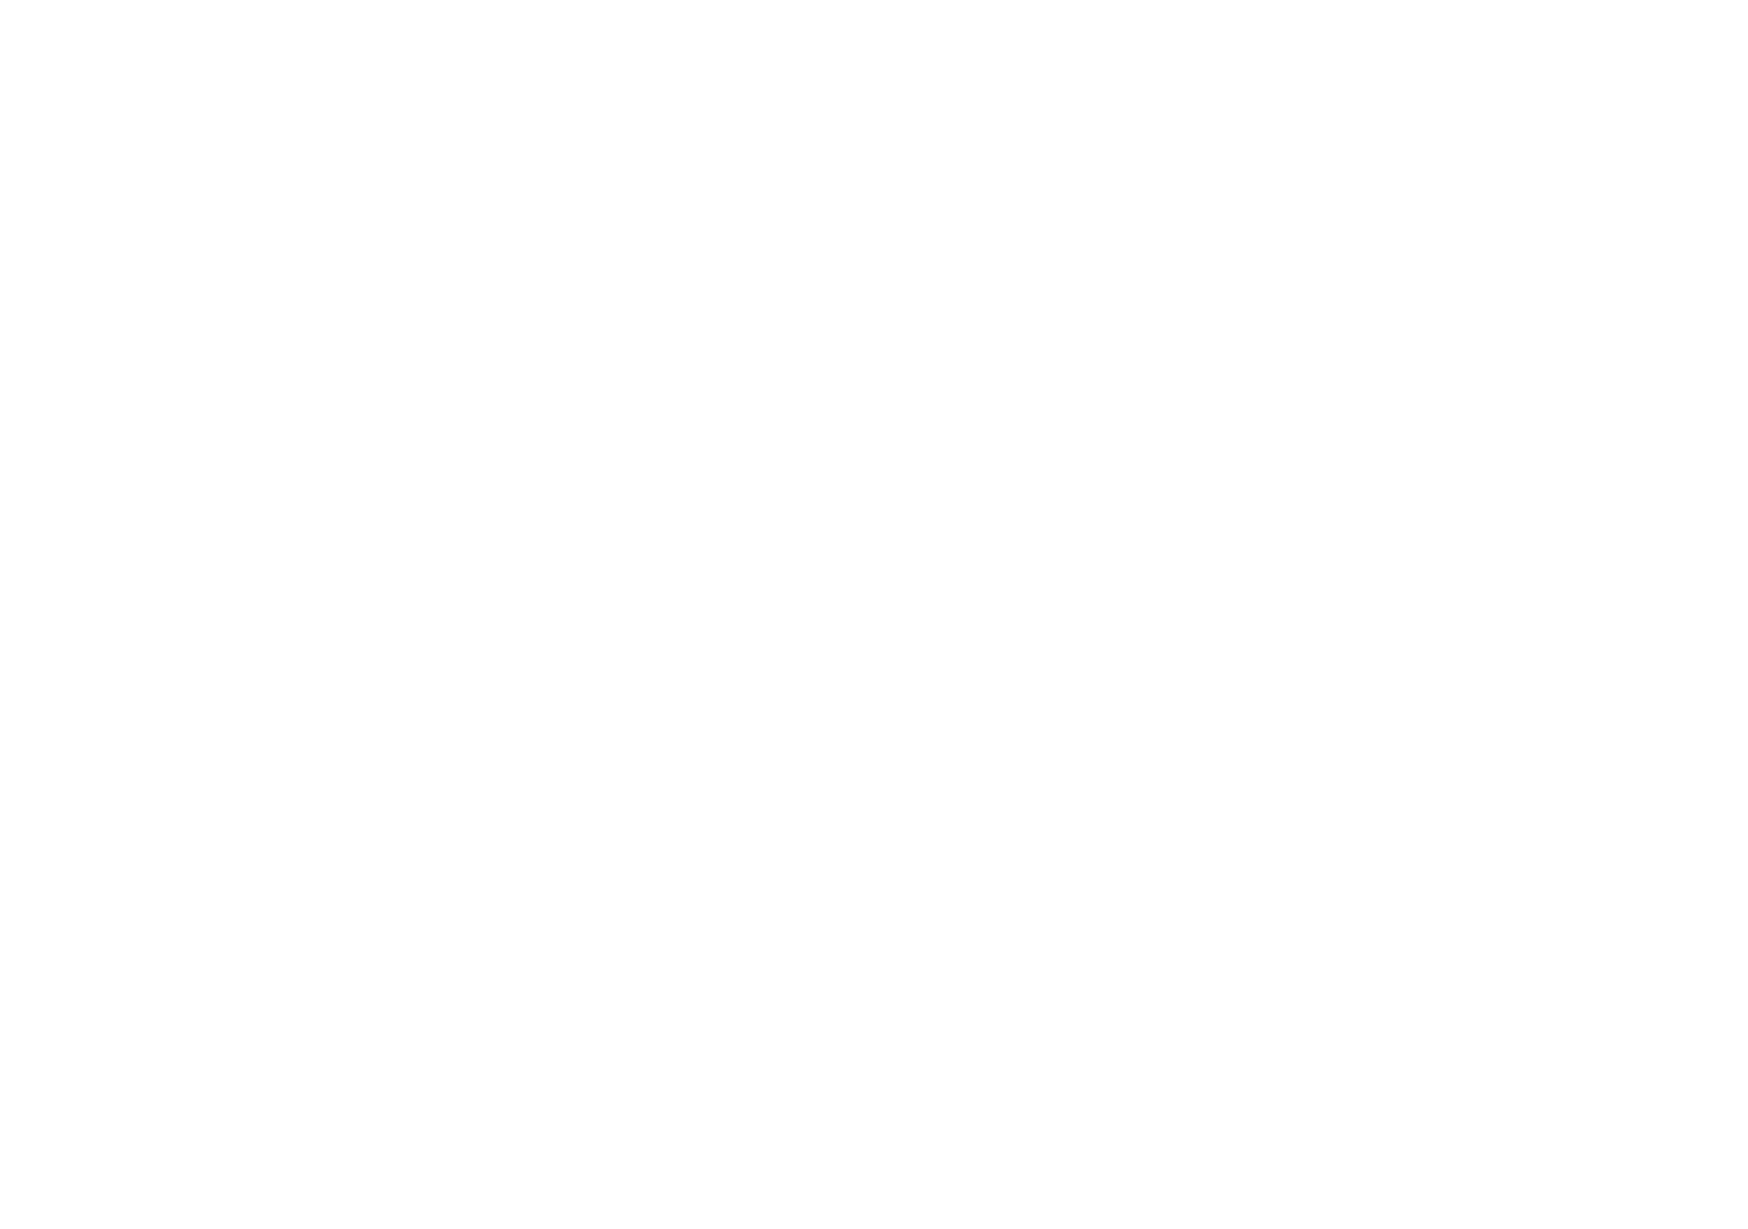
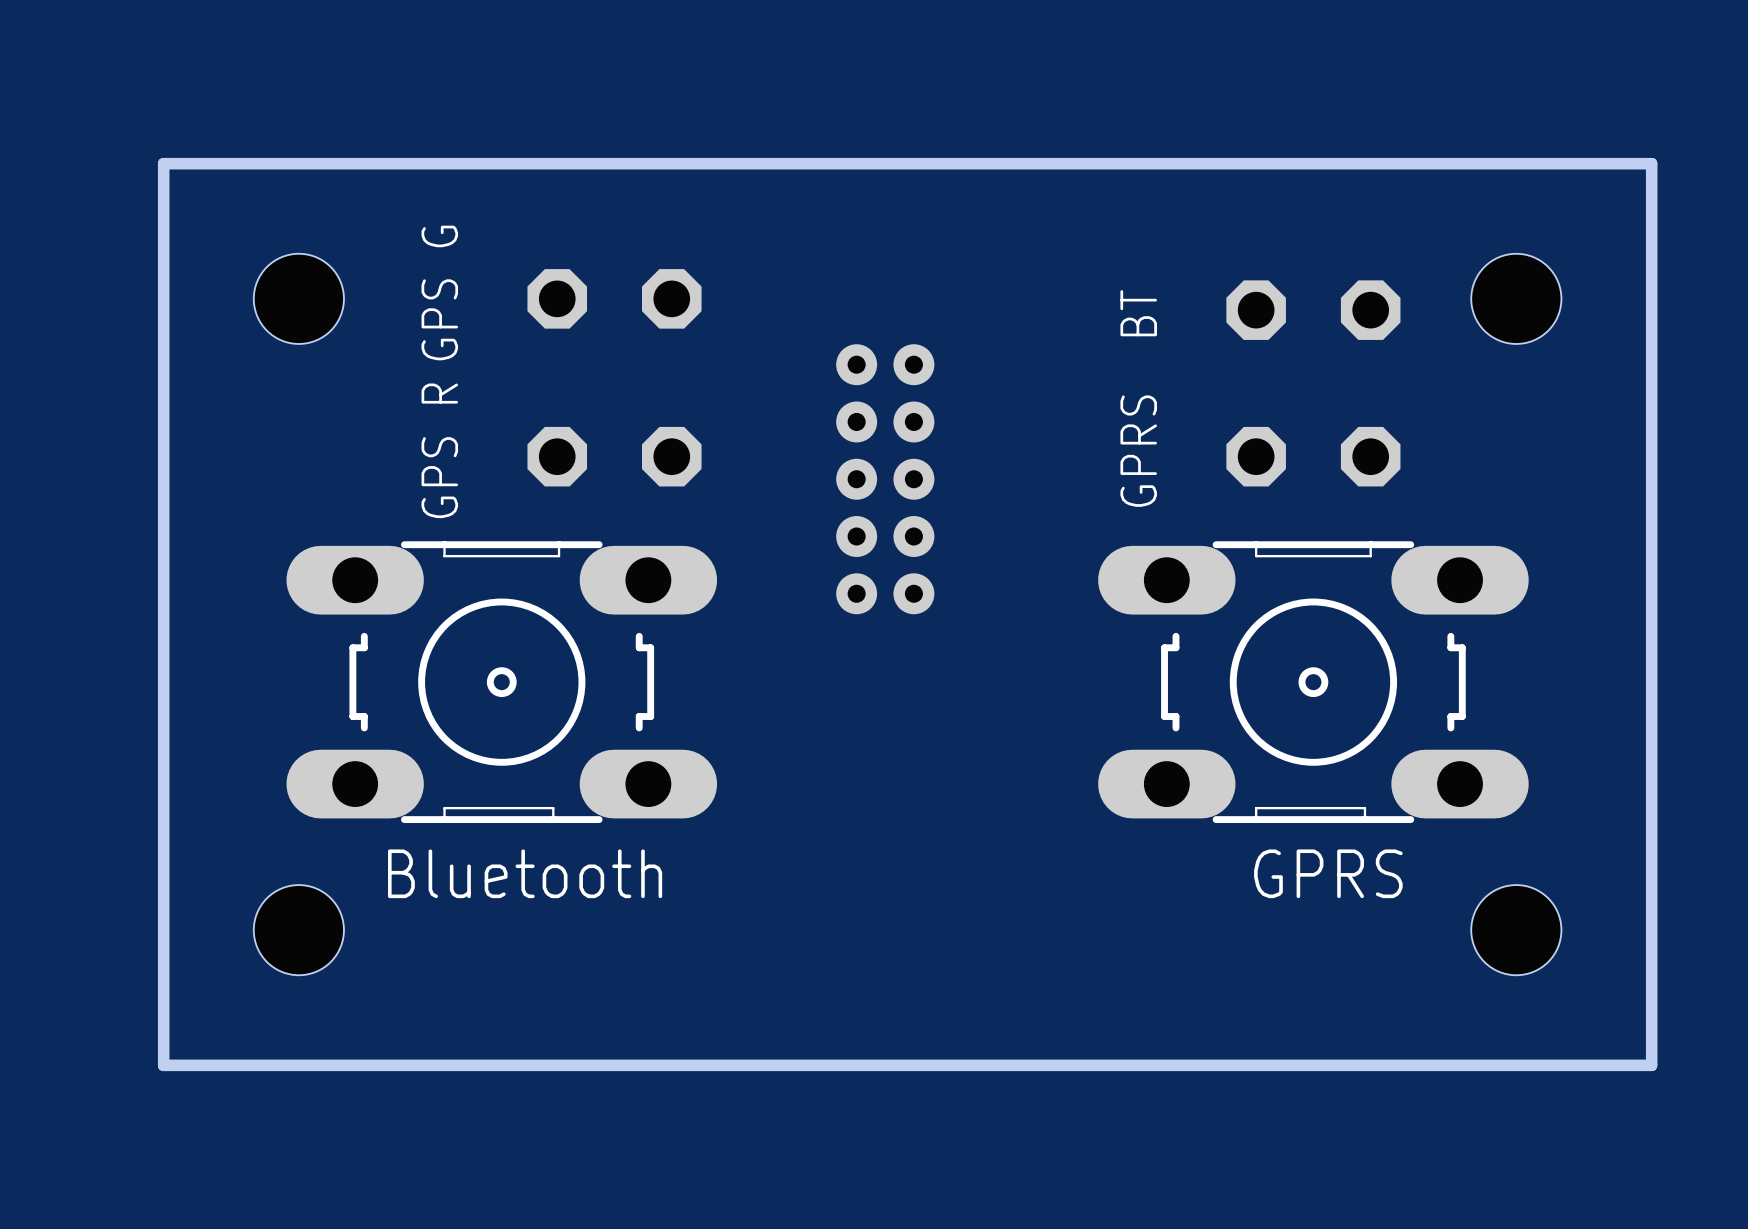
board edge: none -> (163, 163) (1651, 163) (1651, 1065) (163, 1065) (163, 163)
hole: none -> (298, 298)
part: none -> (614, 298)
hole: none -> (1516, 298)
text: none -> GPS G (439, 292)
part: none -> (1313, 310)
text: none -> BT (1138, 313)
part: none -> (614, 456)
part: none -> (1313, 456)
text: none -> GPS R (439, 450)
text: none -> GPRS (1138, 451)
part: none -> (885, 479)
part: none -> (501, 682)
part: none -> (1313, 682)
text: none -> Bluetooth (525, 873)
text: none -> GPRS (1328, 873)
hole: none -> (298, 930)
hole: none -> (1516, 930)

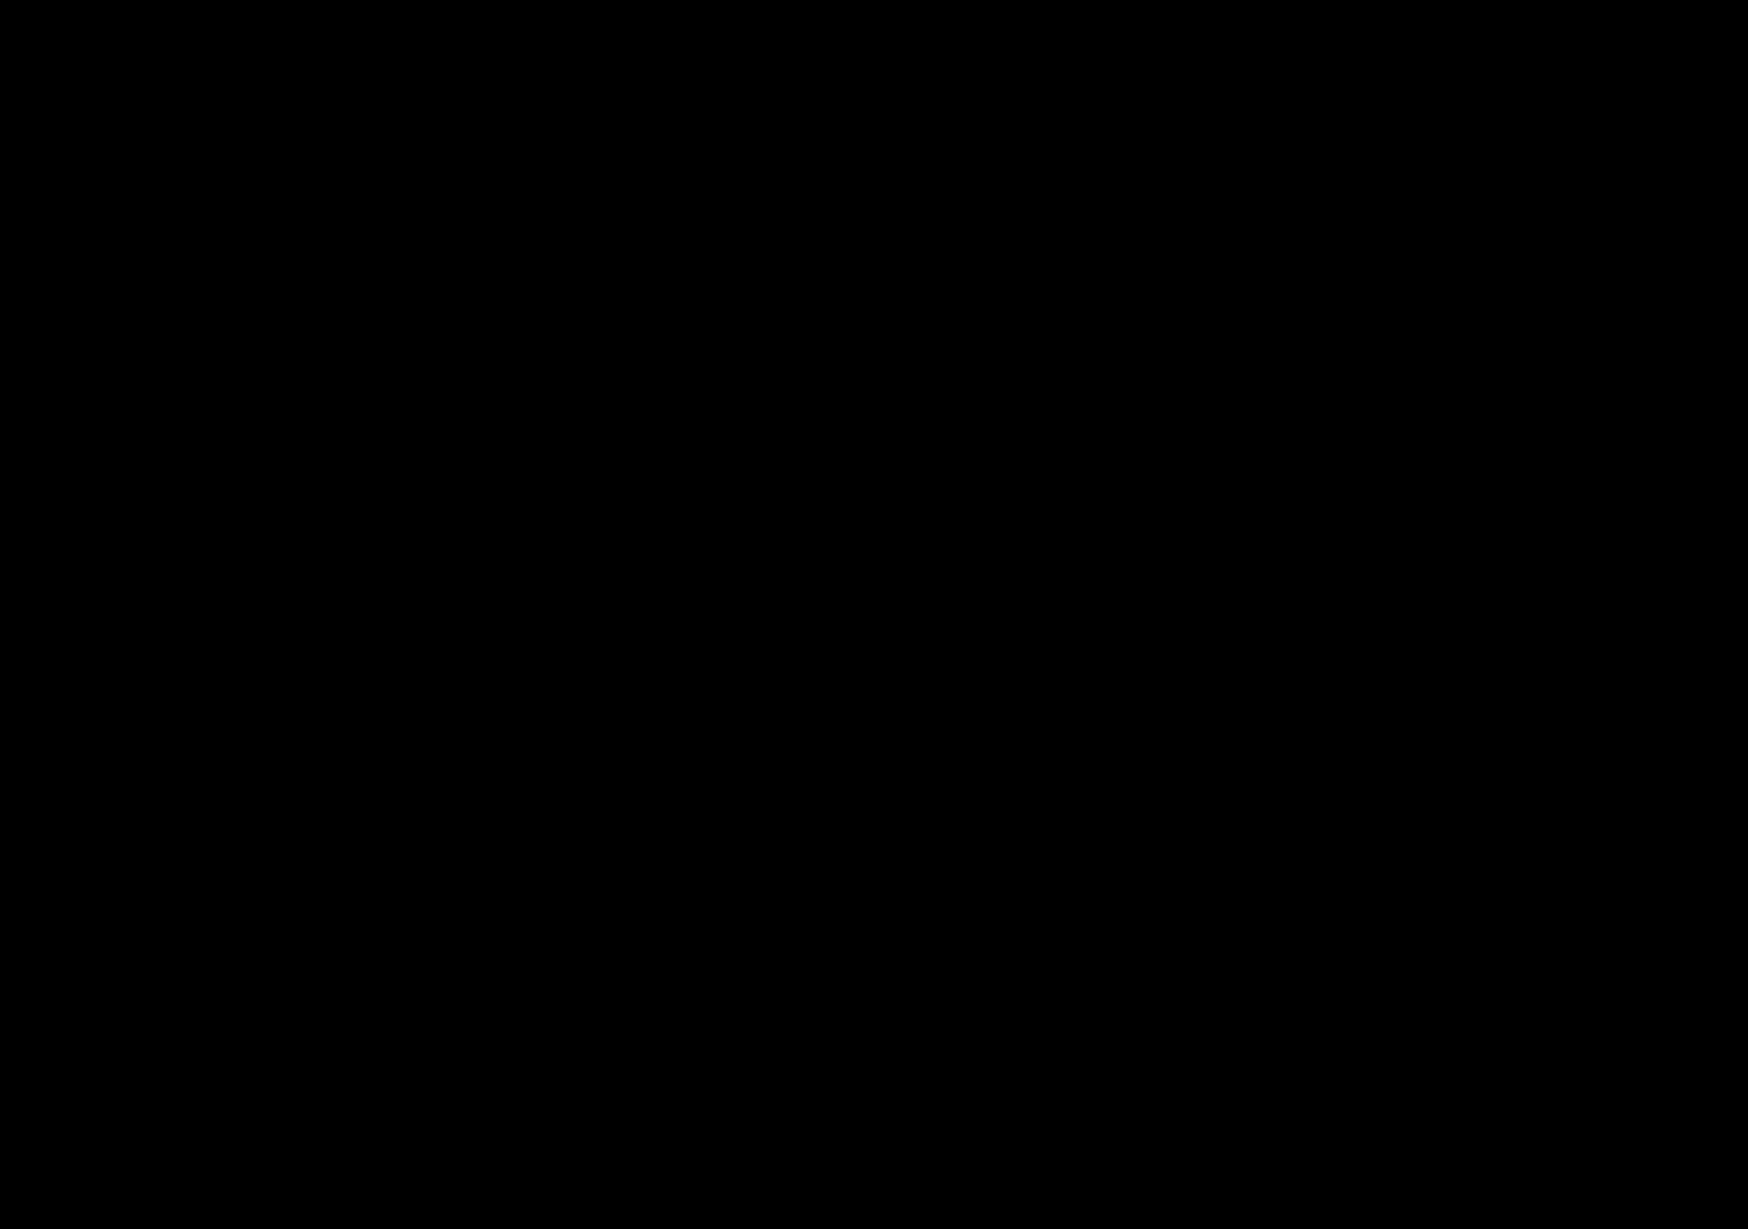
board edge: (163, 163) (1651, 163) (1651, 1065) (163, 1065) (163, 163) -> none
text: GPS G (439, 292) -> none
hole: (298, 298) -> none
part: (614, 298) -> none
hole: (1516, 298) -> none
part: (1313, 310) -> none
text: BT (1138, 313) -> none
text: GPS R (439, 450) -> none
text: GPRS (1138, 451) -> none
part: (614, 456) -> none
part: (1313, 456) -> none
part: (885, 479) -> none
part: (501, 682) -> none
part: (1313, 682) -> none
text: Bluetooth (525, 873) -> none
text: GPRS (1328, 873) -> none
hole: (298, 930) -> none
hole: (1516, 930) -> none

